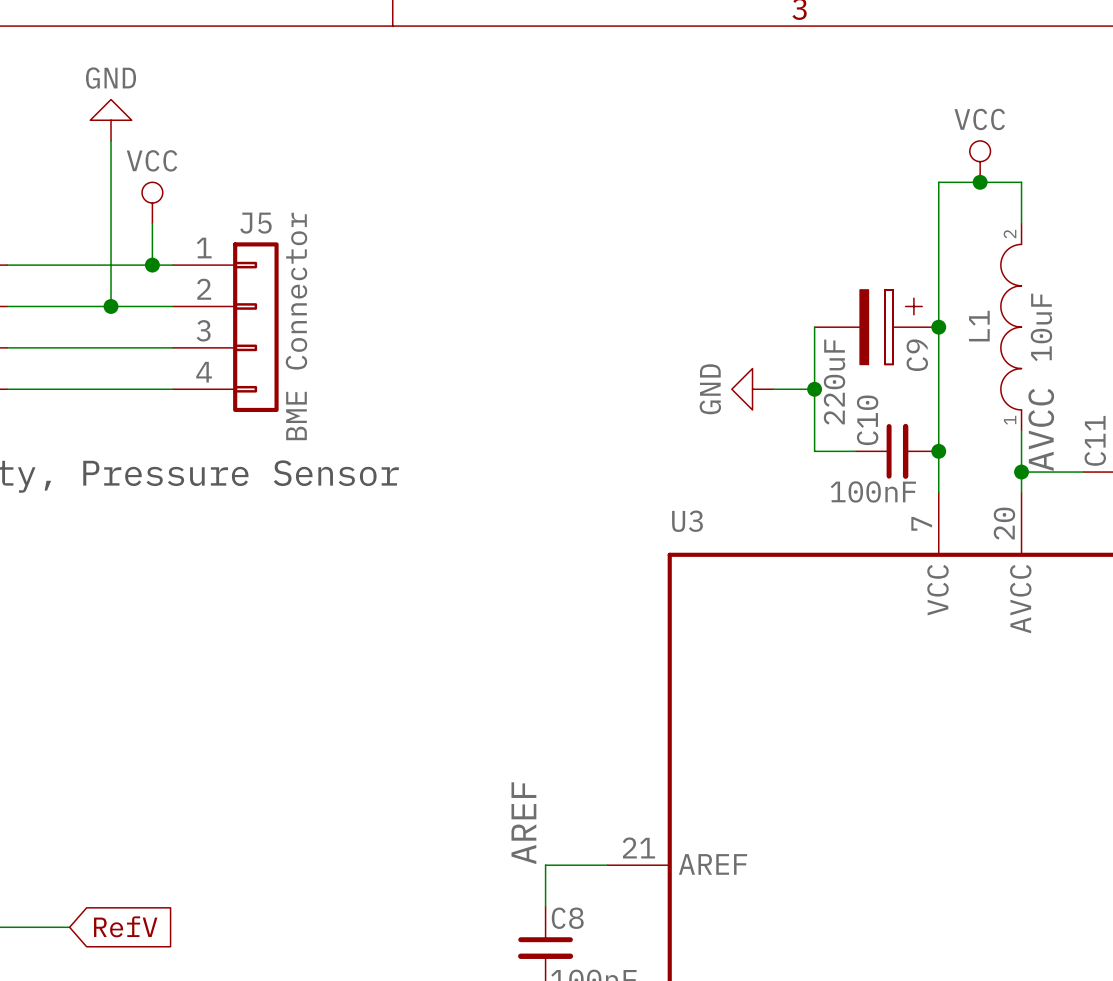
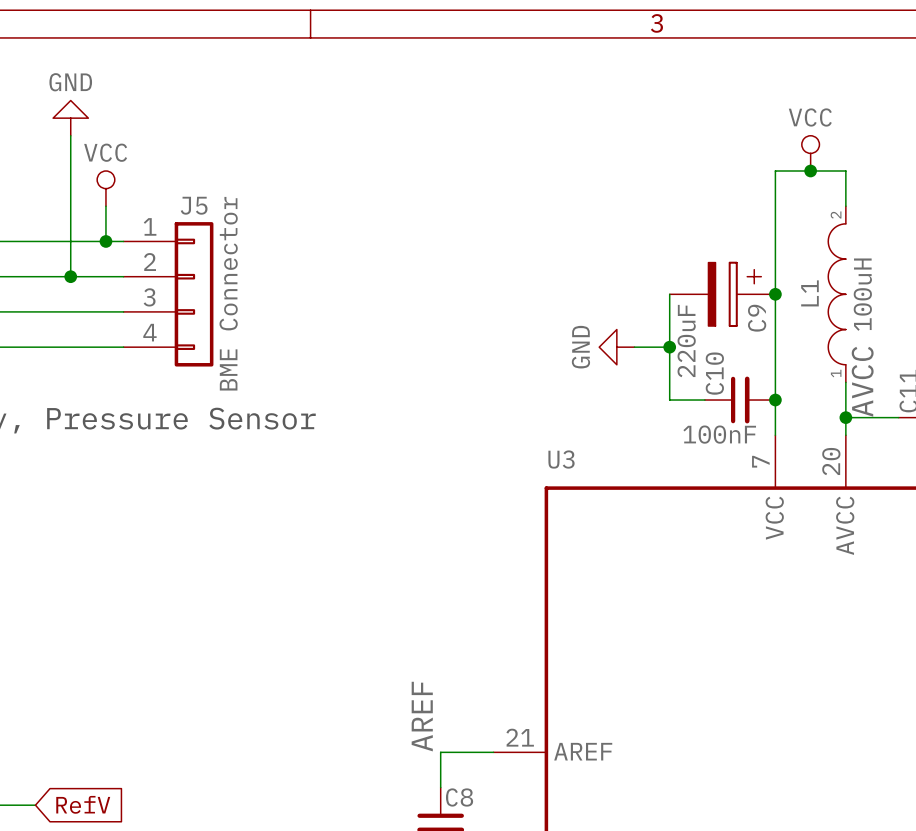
L1 value: 10uF (1041, 327) -> 100uH (862, 294)

